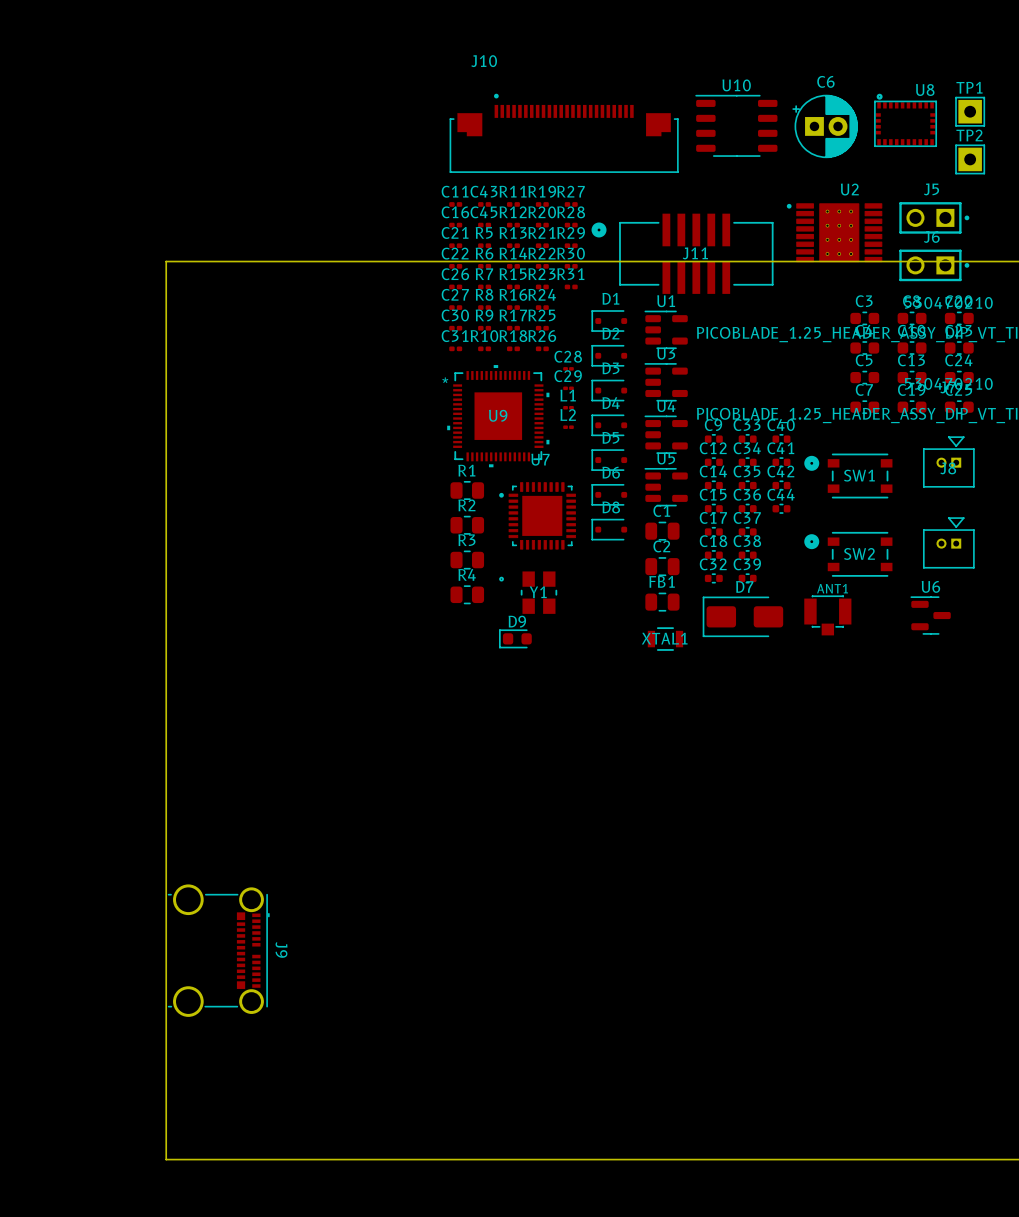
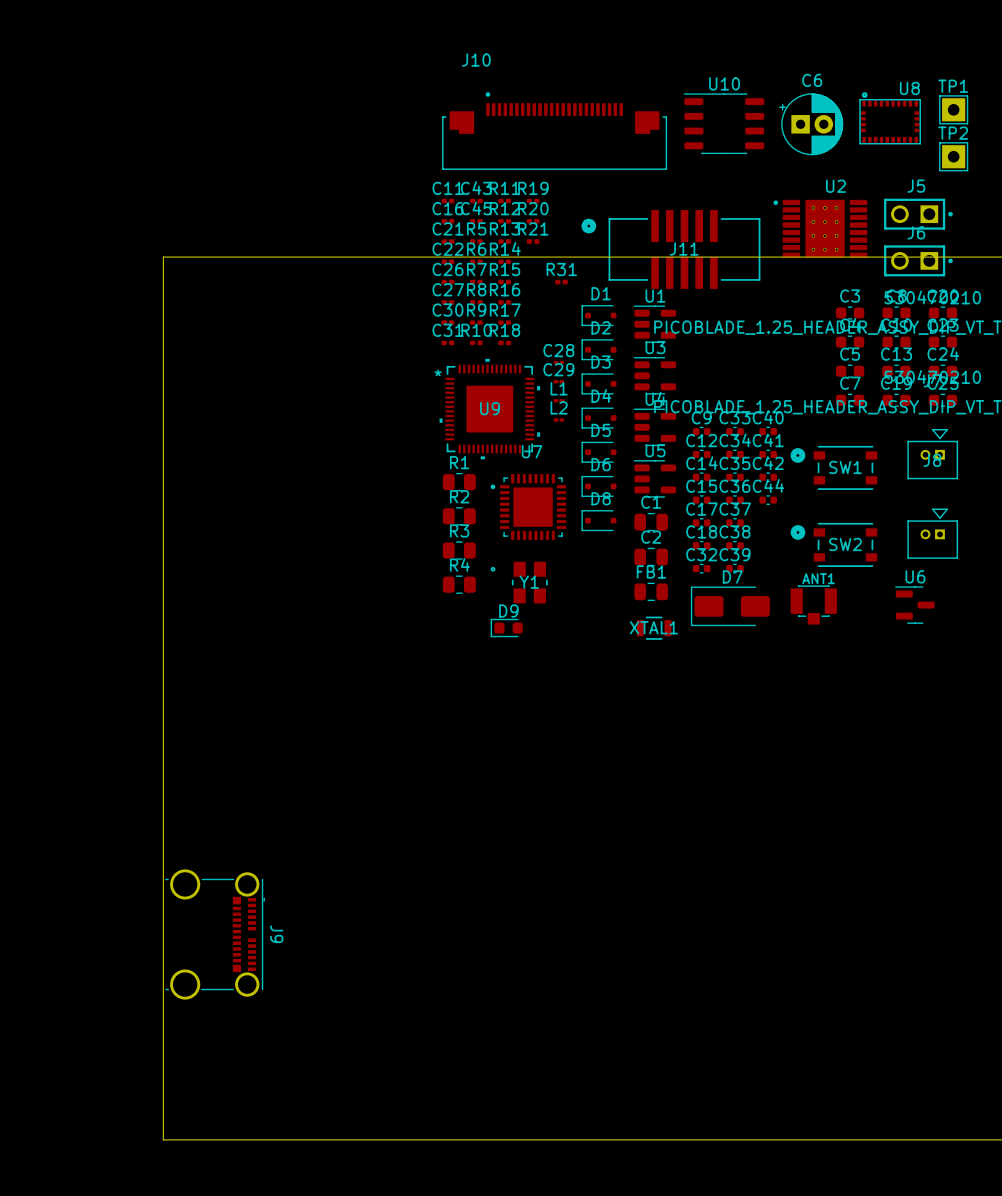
R27: (571, 204) -> none
R28: (571, 225) -> none
R29: (571, 245) -> none
R22: (542, 266) -> none
R30: (571, 266) -> none
R23: (542, 286) -> none
R24: (542, 307) -> none
R25: (542, 328) -> none
R26: (542, 348) -> none

